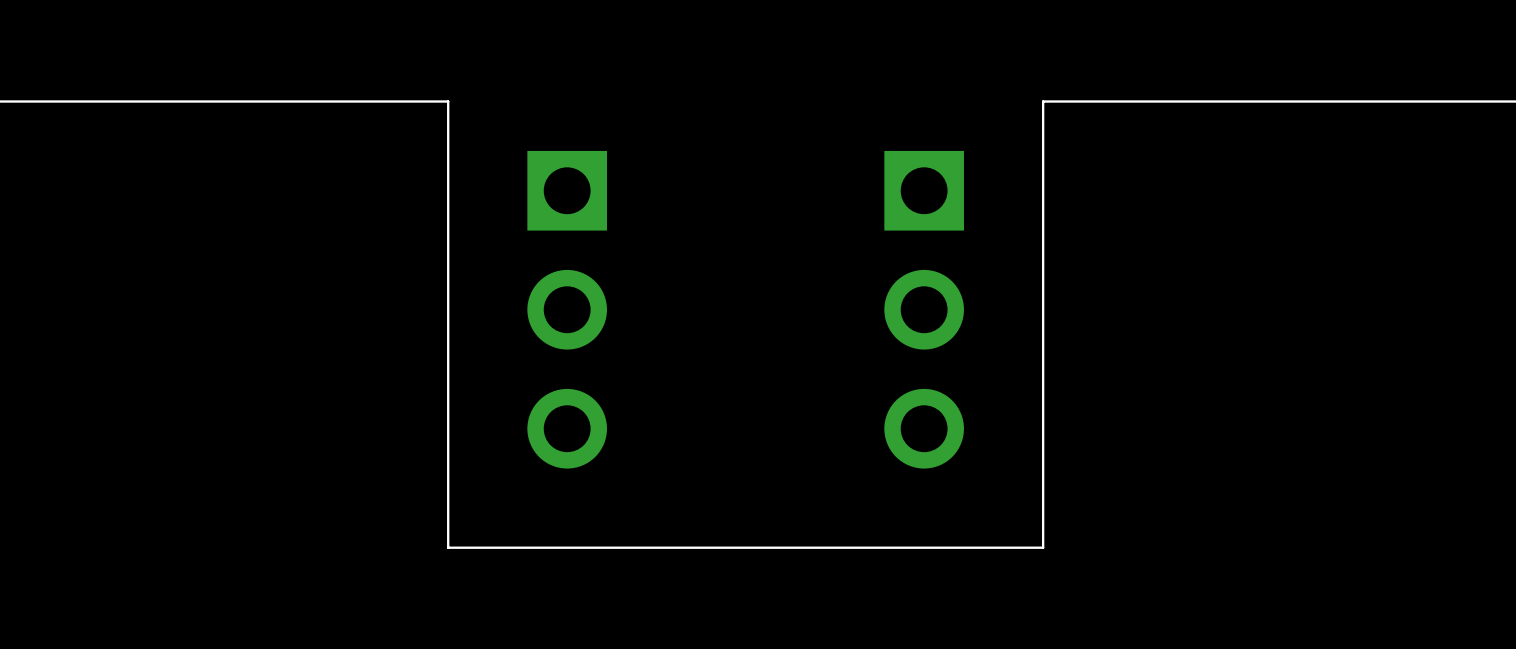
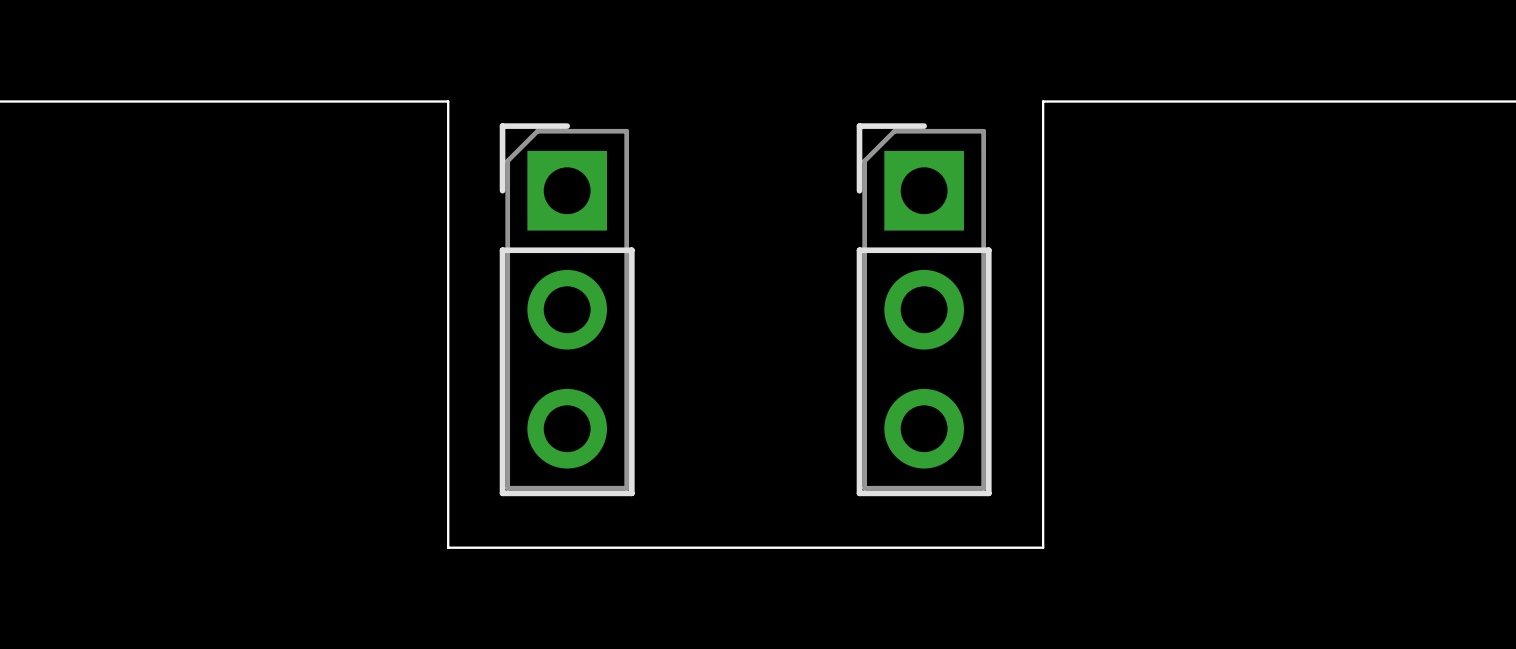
part side: top (567, 309) -> bottom (567, 309)
part side: top (924, 309) -> bottom (924, 309)

